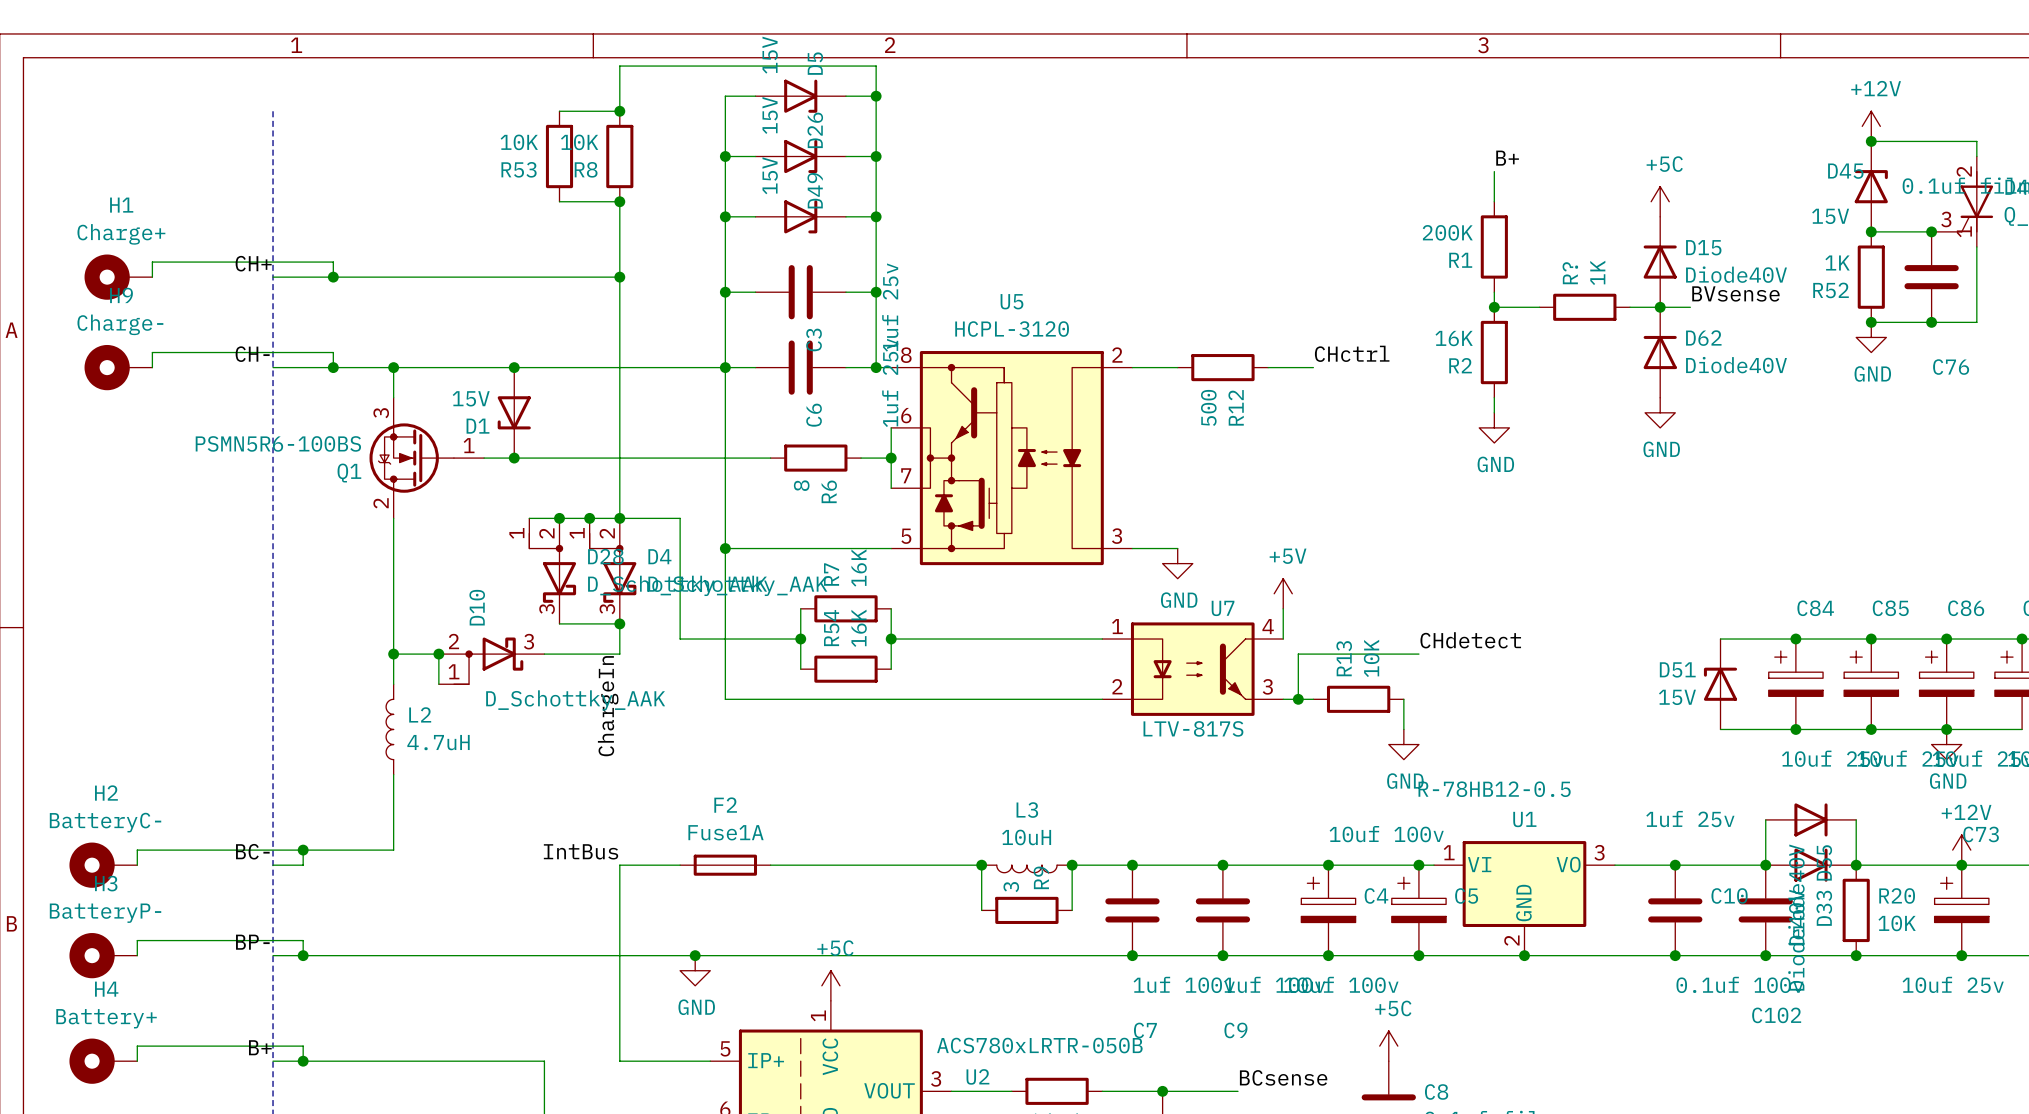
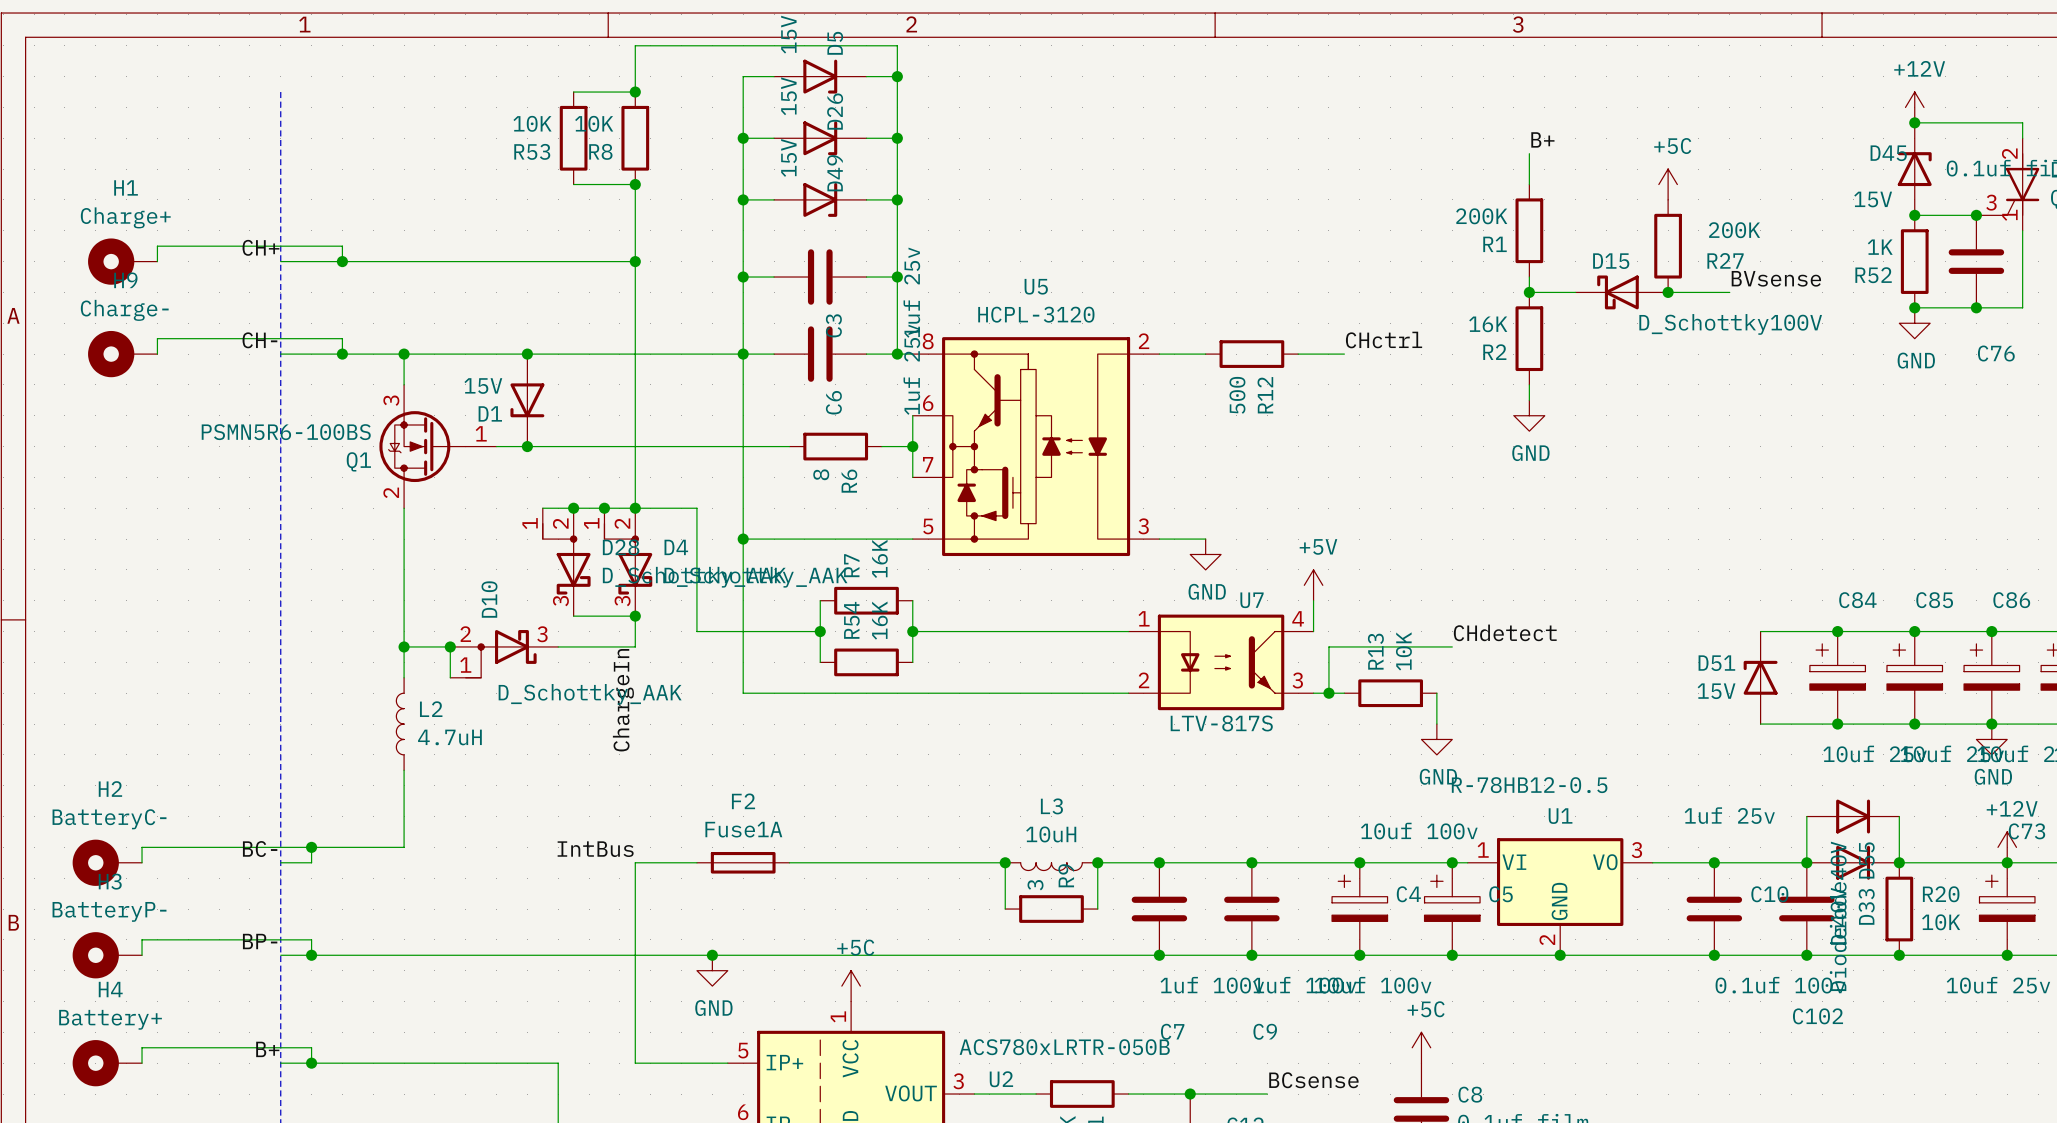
power symbol position: +5C (1660, 201) -> +5C (1668, 184)
D15 symbol: [1643, 216, 1677, 308] -> [1575, 275, 1669, 310]
D15 name position: D15 (1703, 247) -> D15 (1611, 261)
R27: none -> 200K (1668, 246)
D15 value: Diode40V (1736, 274) -> D_Schottky100V (1730, 324)
R?: 1K (1584, 307) -> none
junction position: (1660, 307) -> (1668, 292)
D62: Diode40V (1660, 352) -> none
power symbol: GND (1660, 412) -> none

